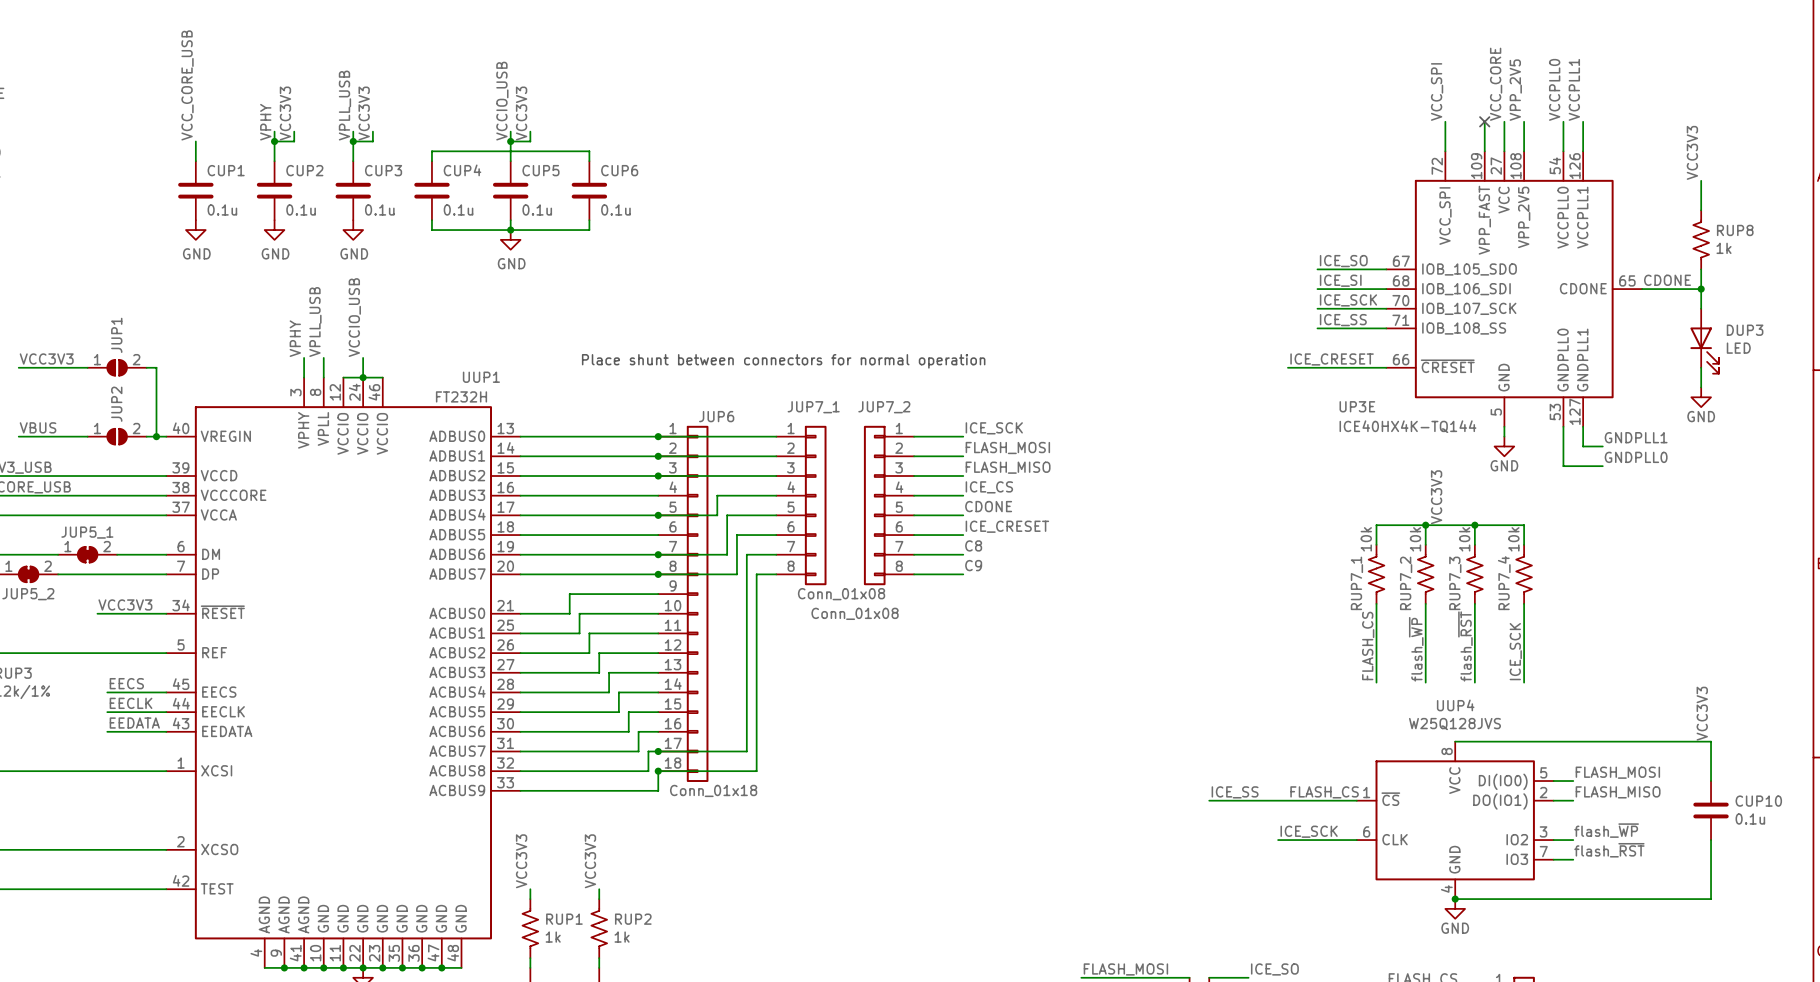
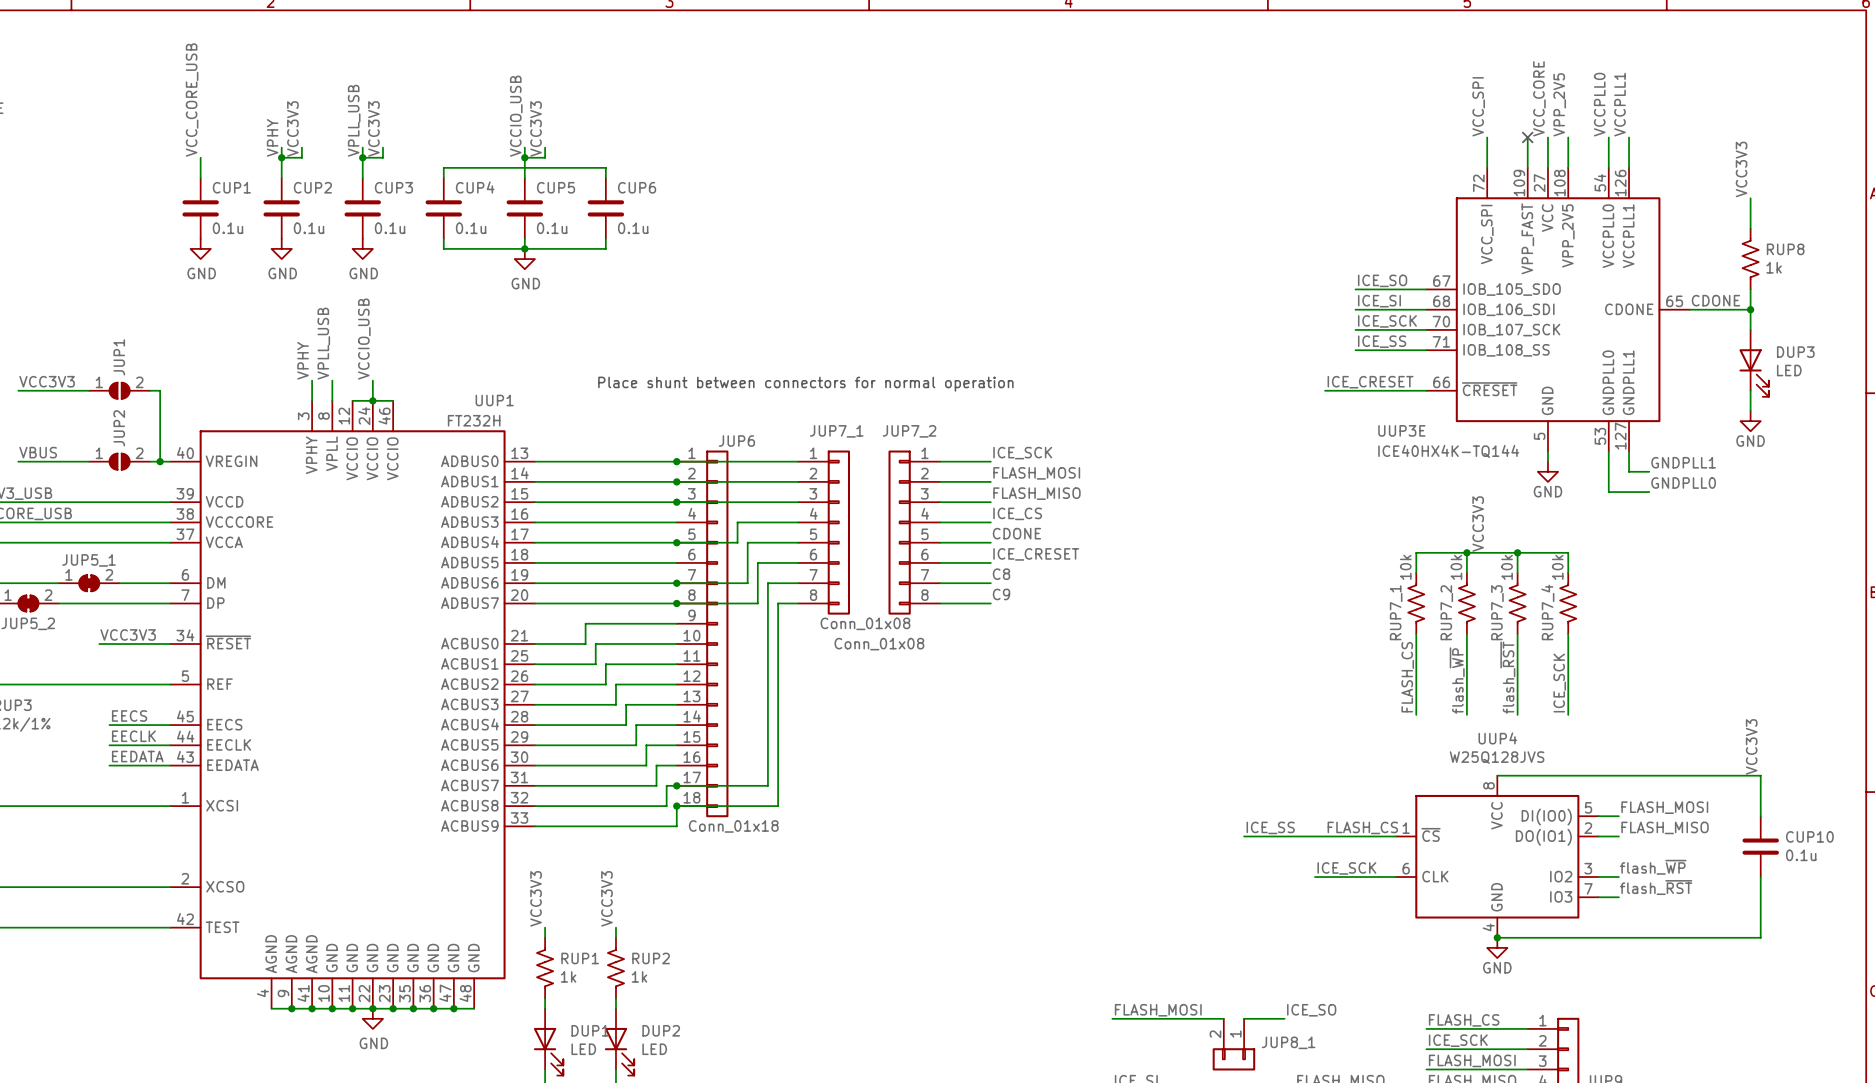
UP3E name: UP3E (1357, 406) -> UUP3E (1401, 430)

